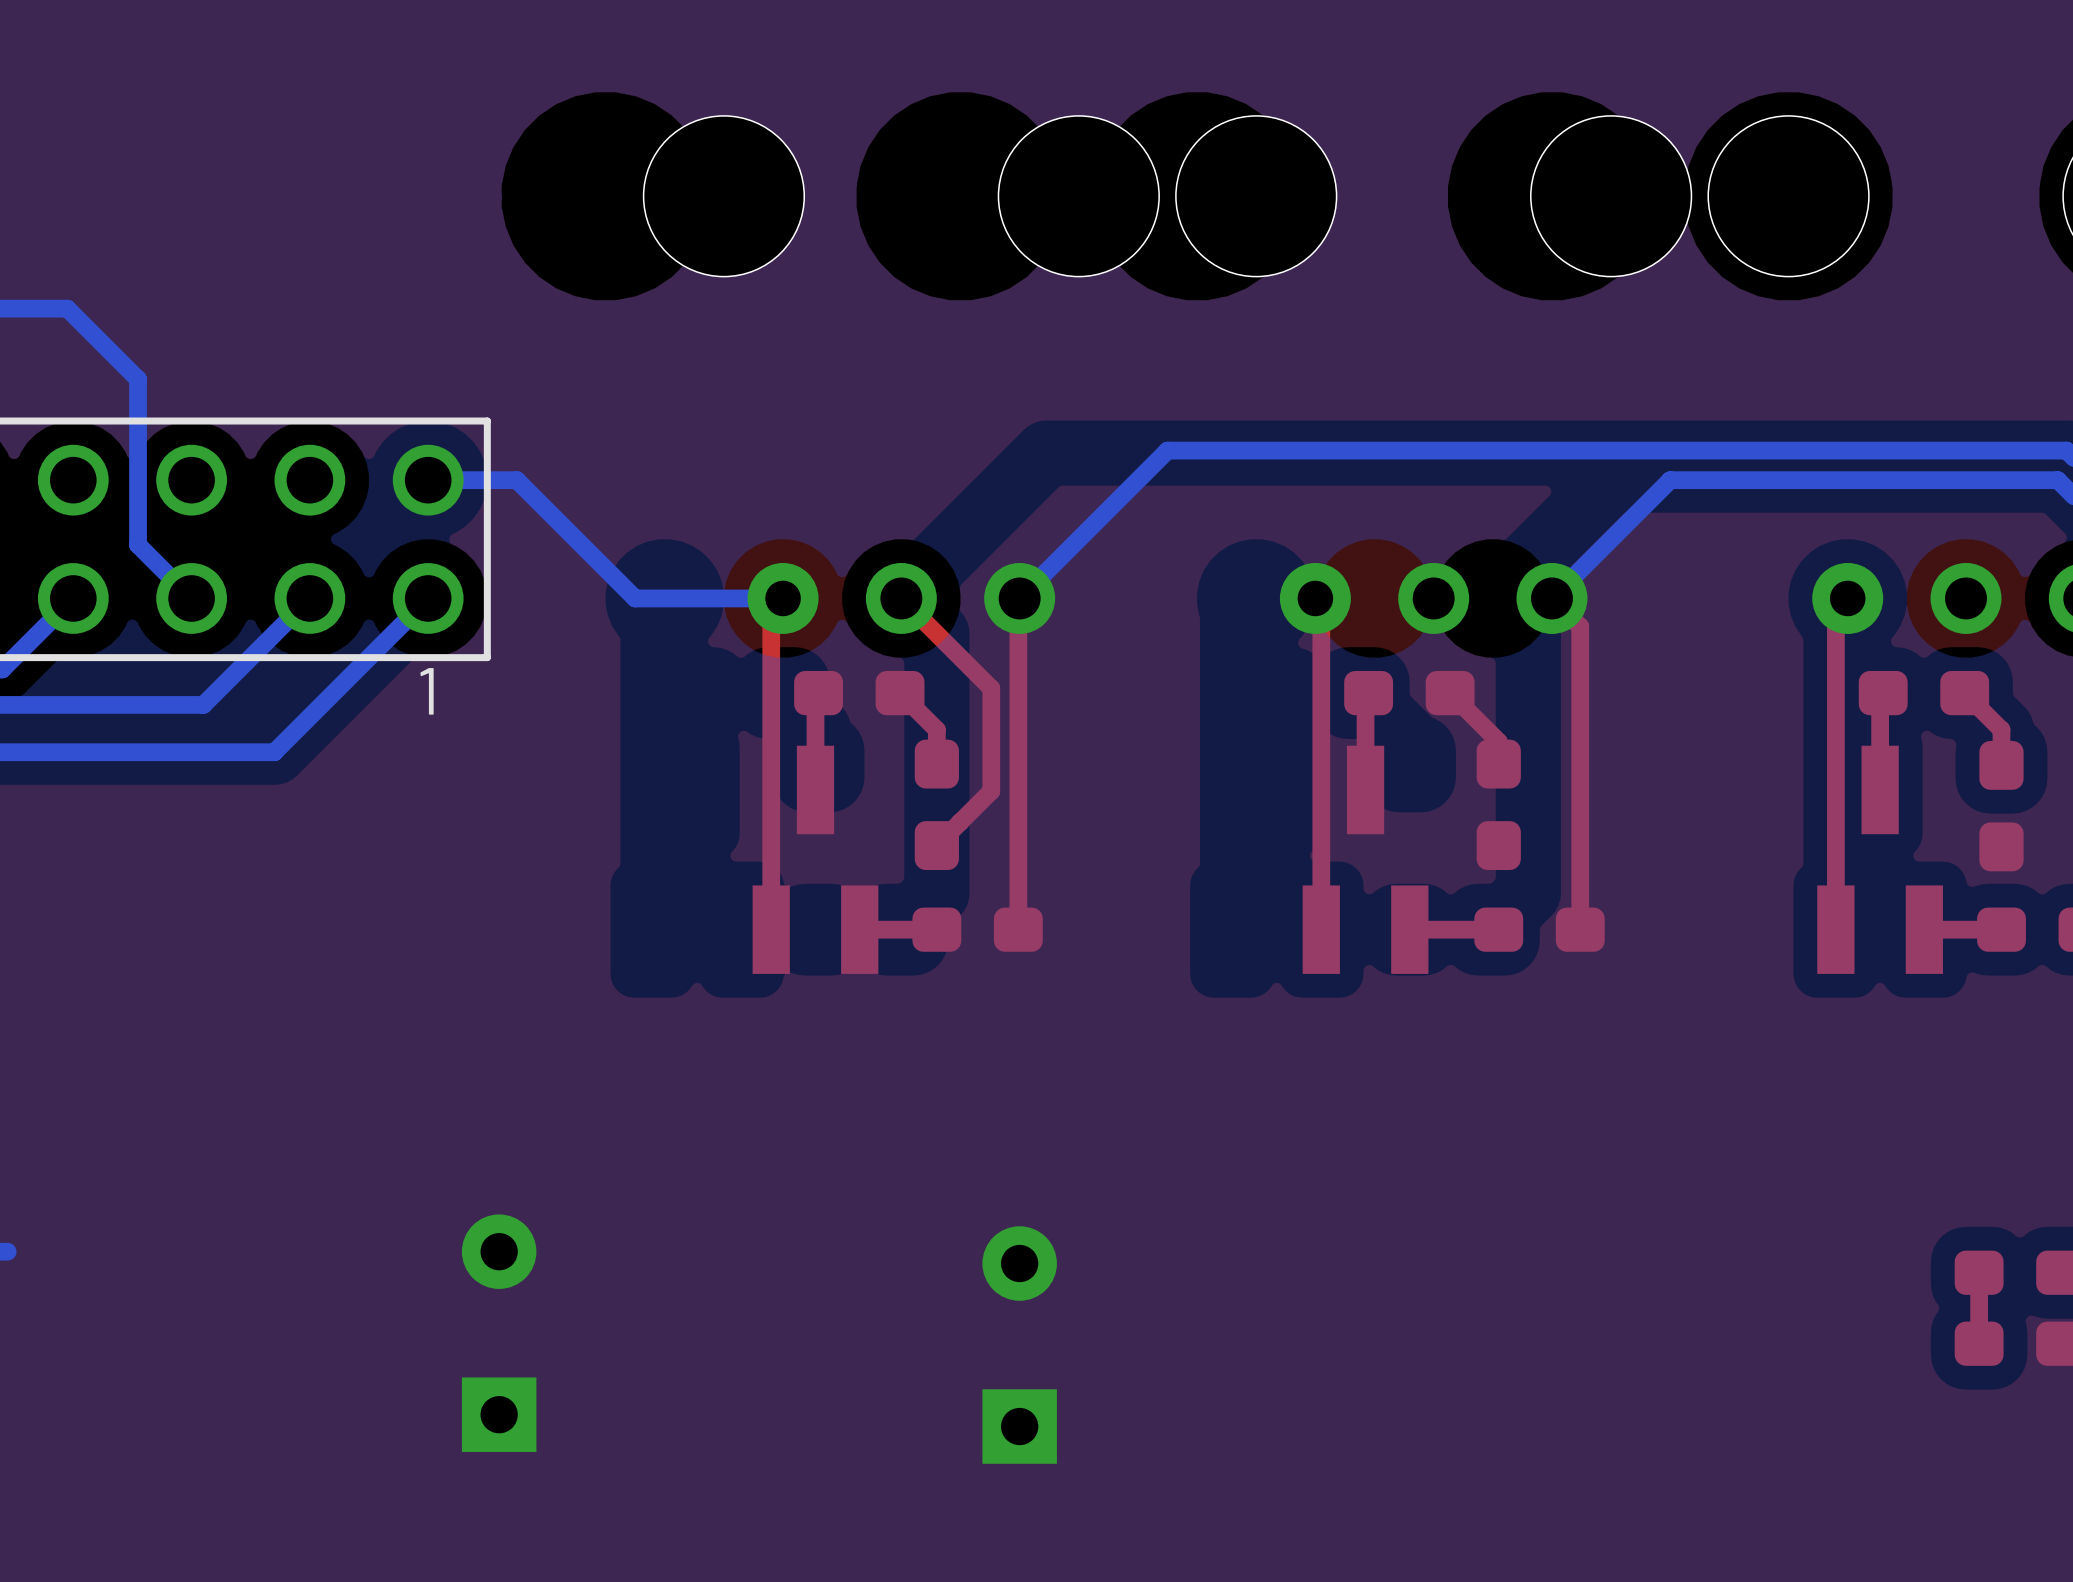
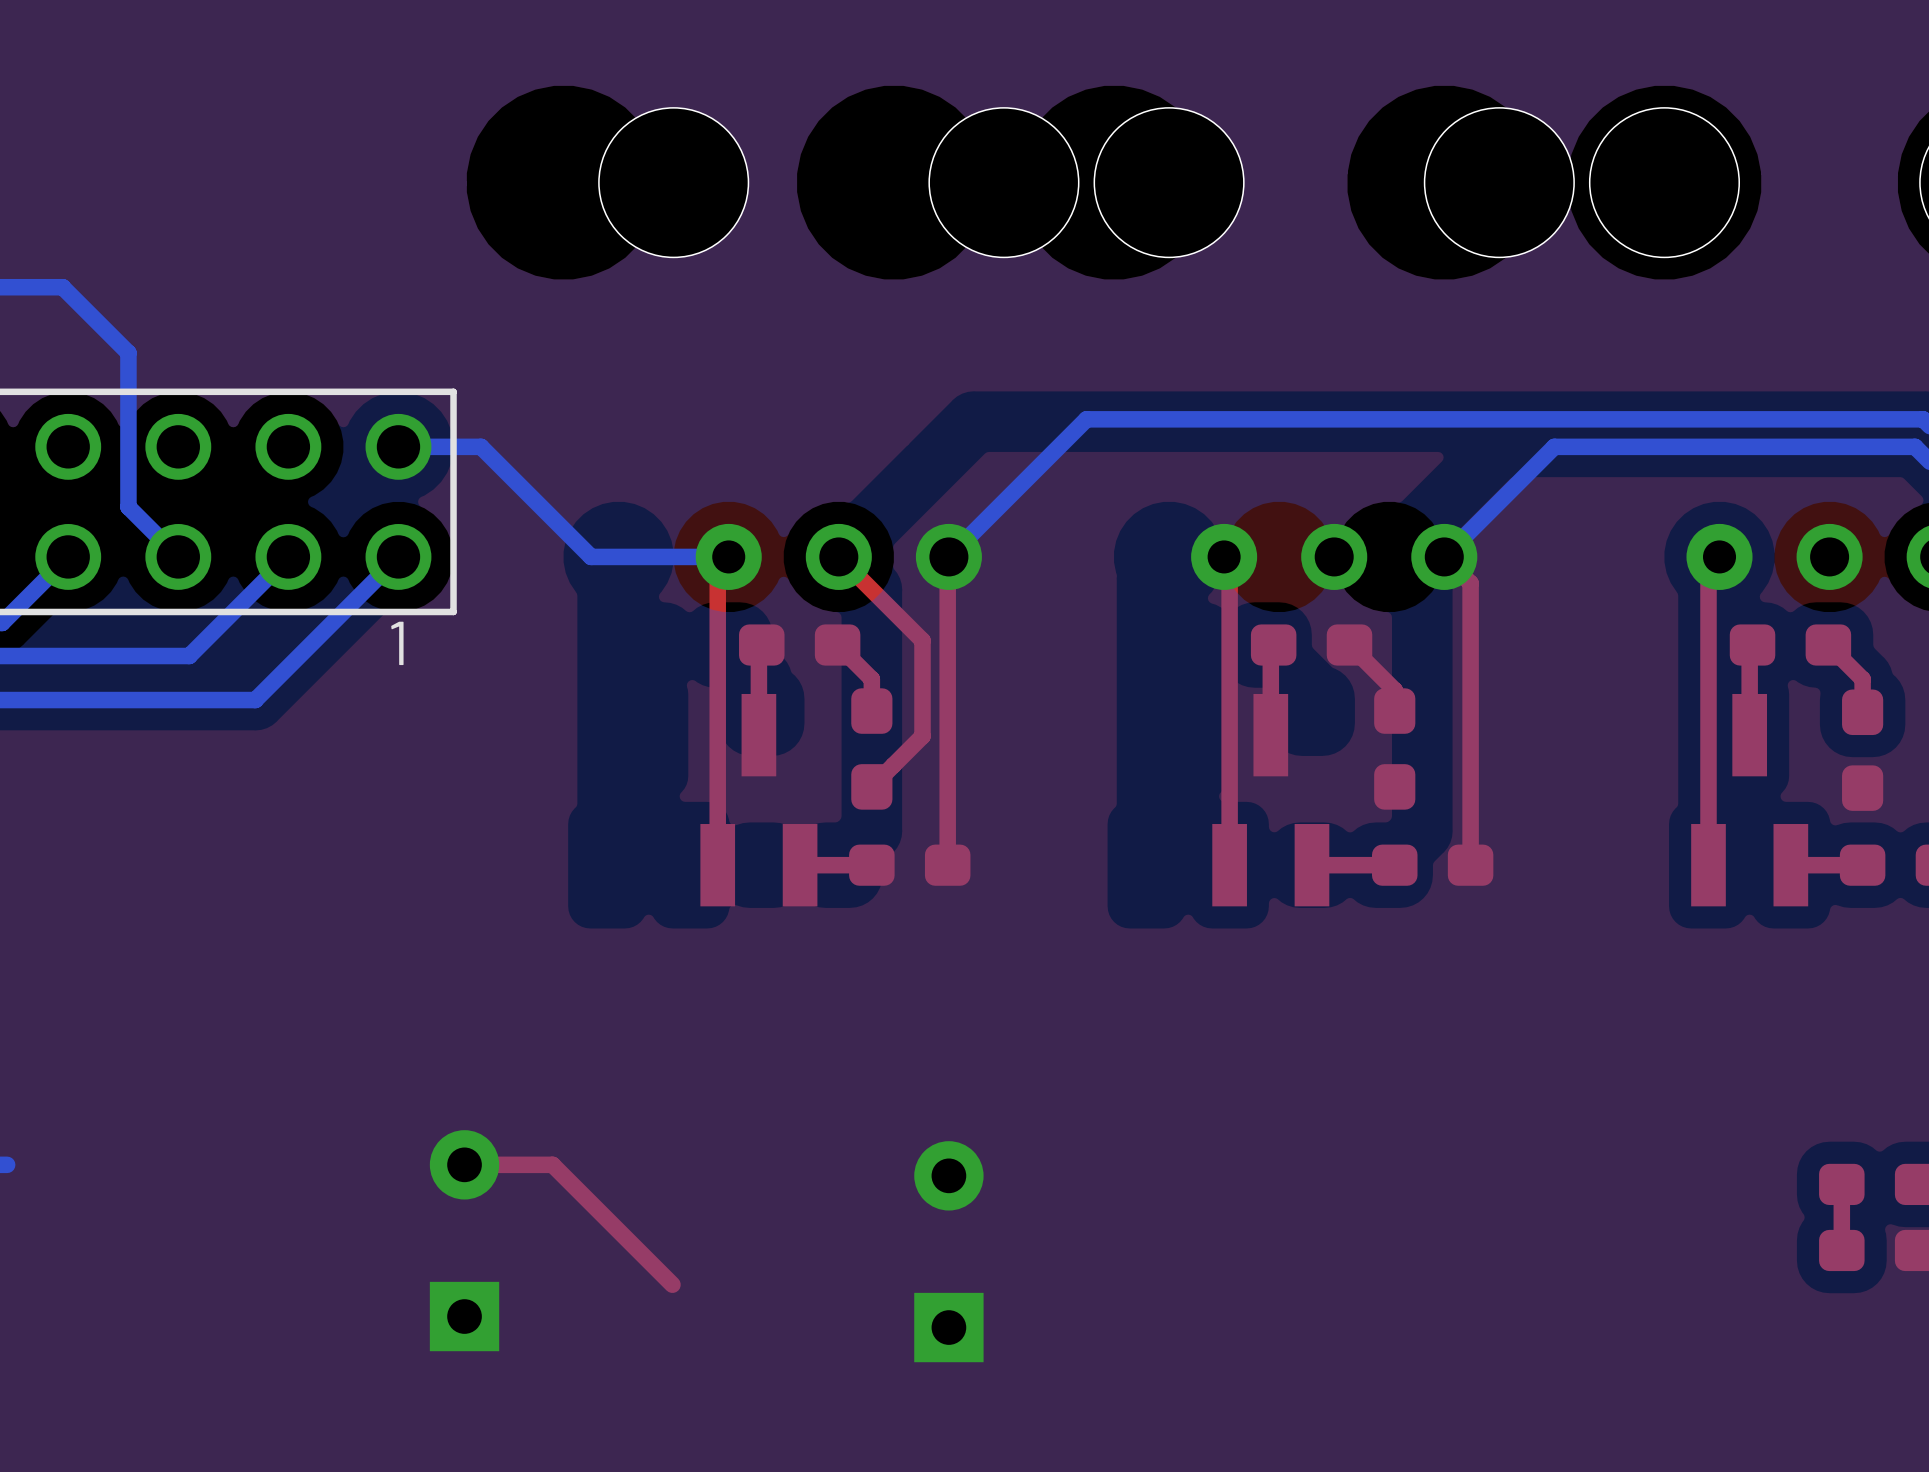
top track: none -> (464, 1164) (552, 1164) (672, 1284)

